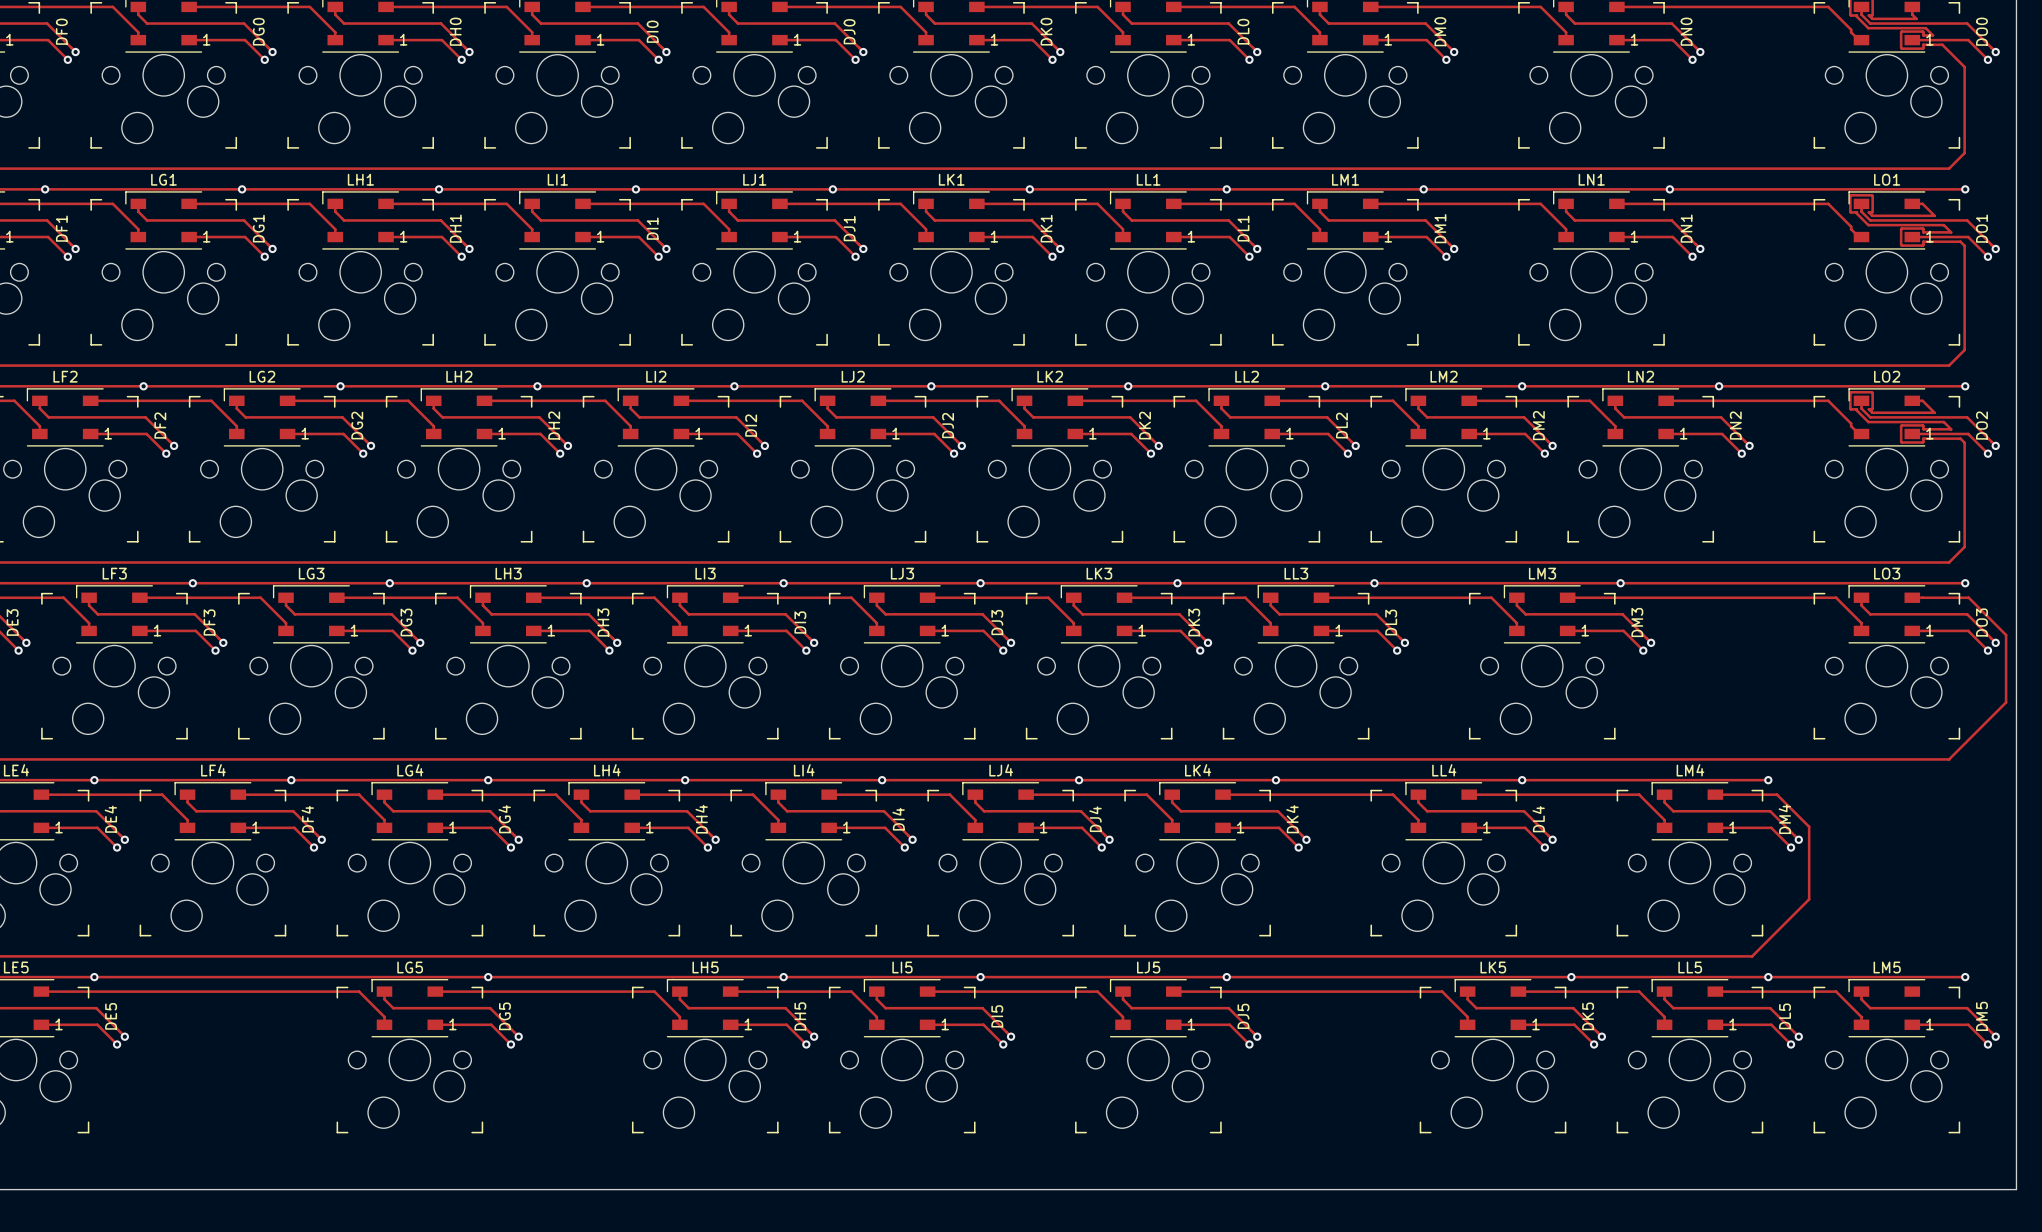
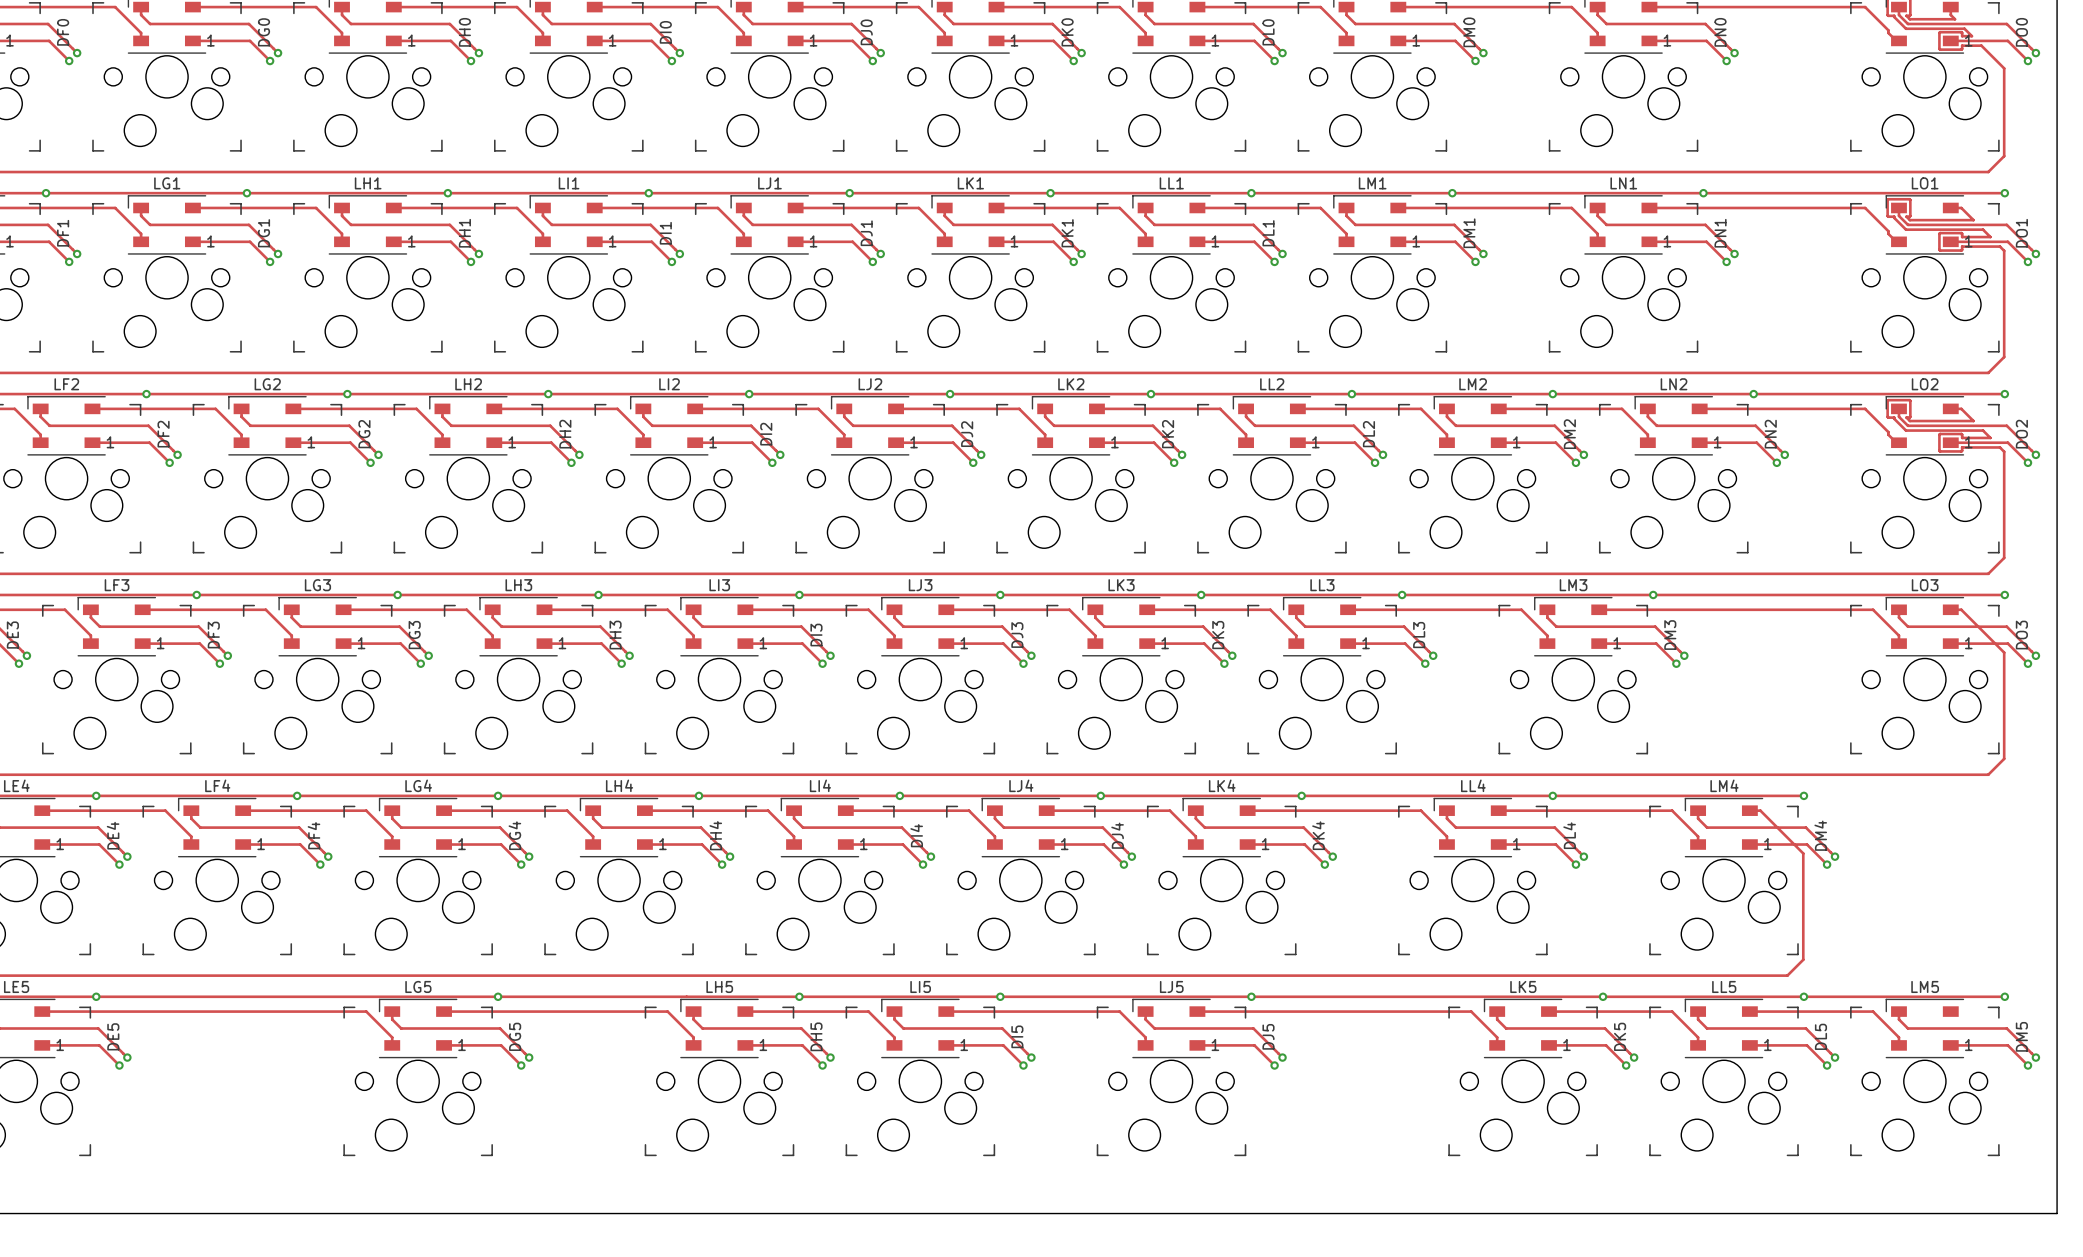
track: (1922, 597) (1968, 597) (2006, 635) (2006, 702) (1964, 743) -> (1961, 609) (2004, 652) (2004, 758)
track: (1725, 794) (1777, 794) (1809, 826) (1809, 899) (1767, 940) -> (1760, 810) (1803, 853) (1803, 959)

